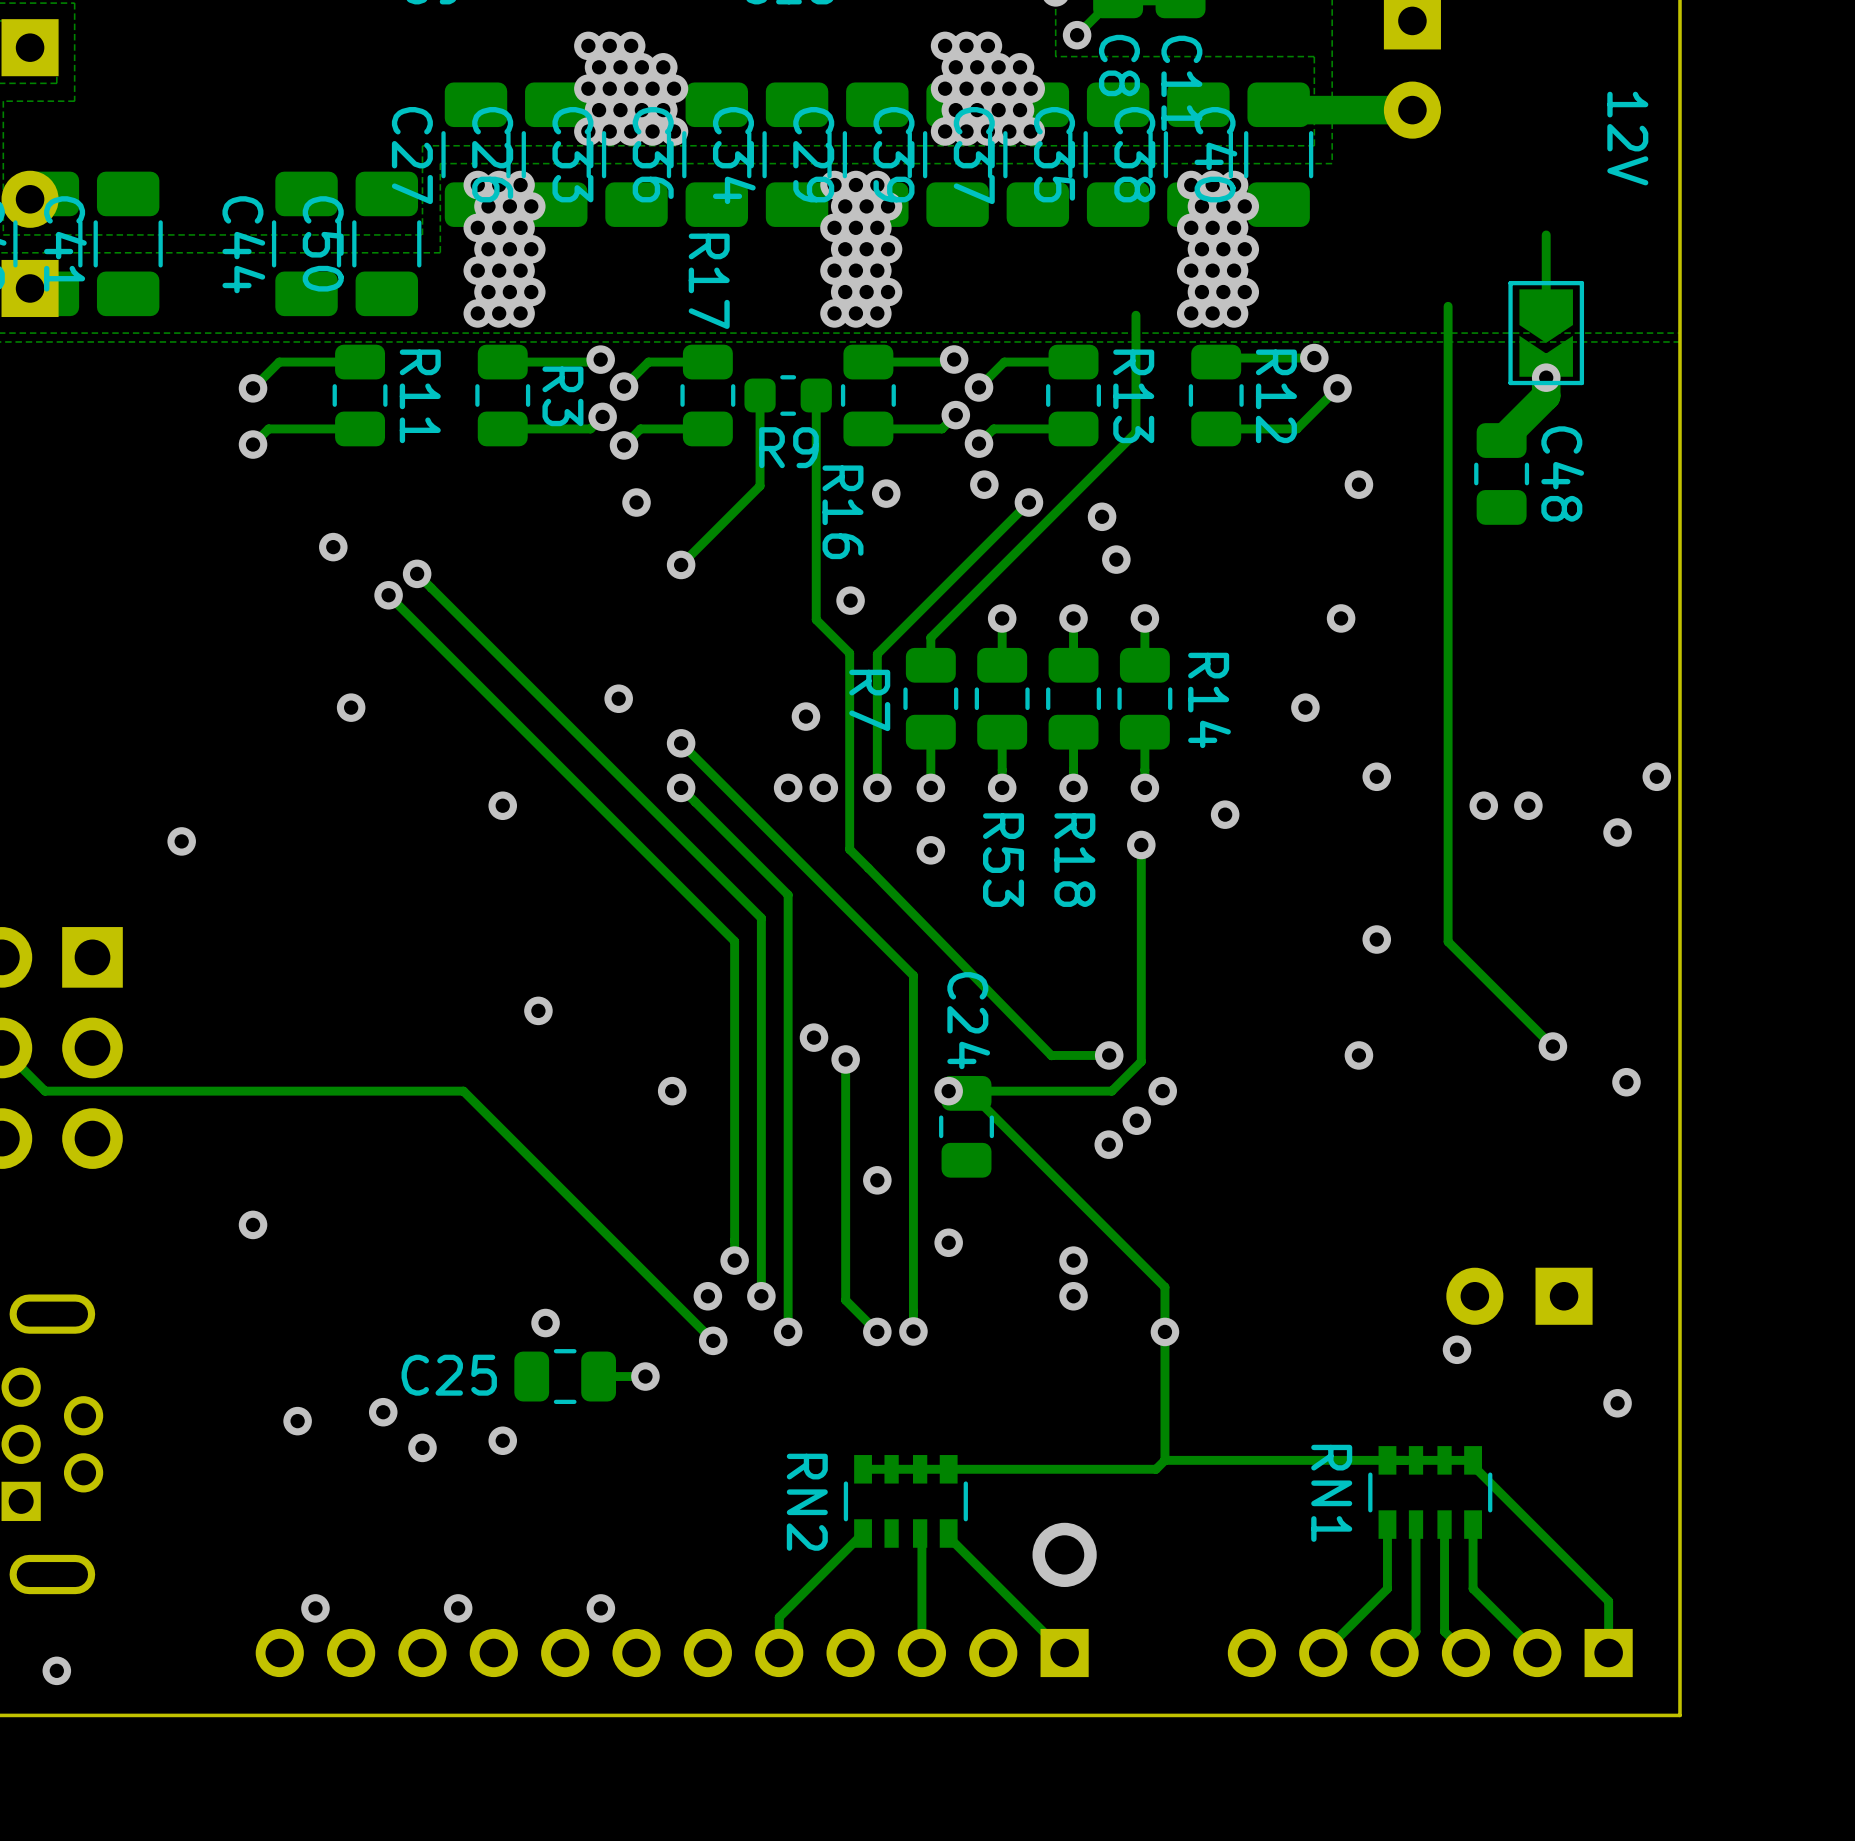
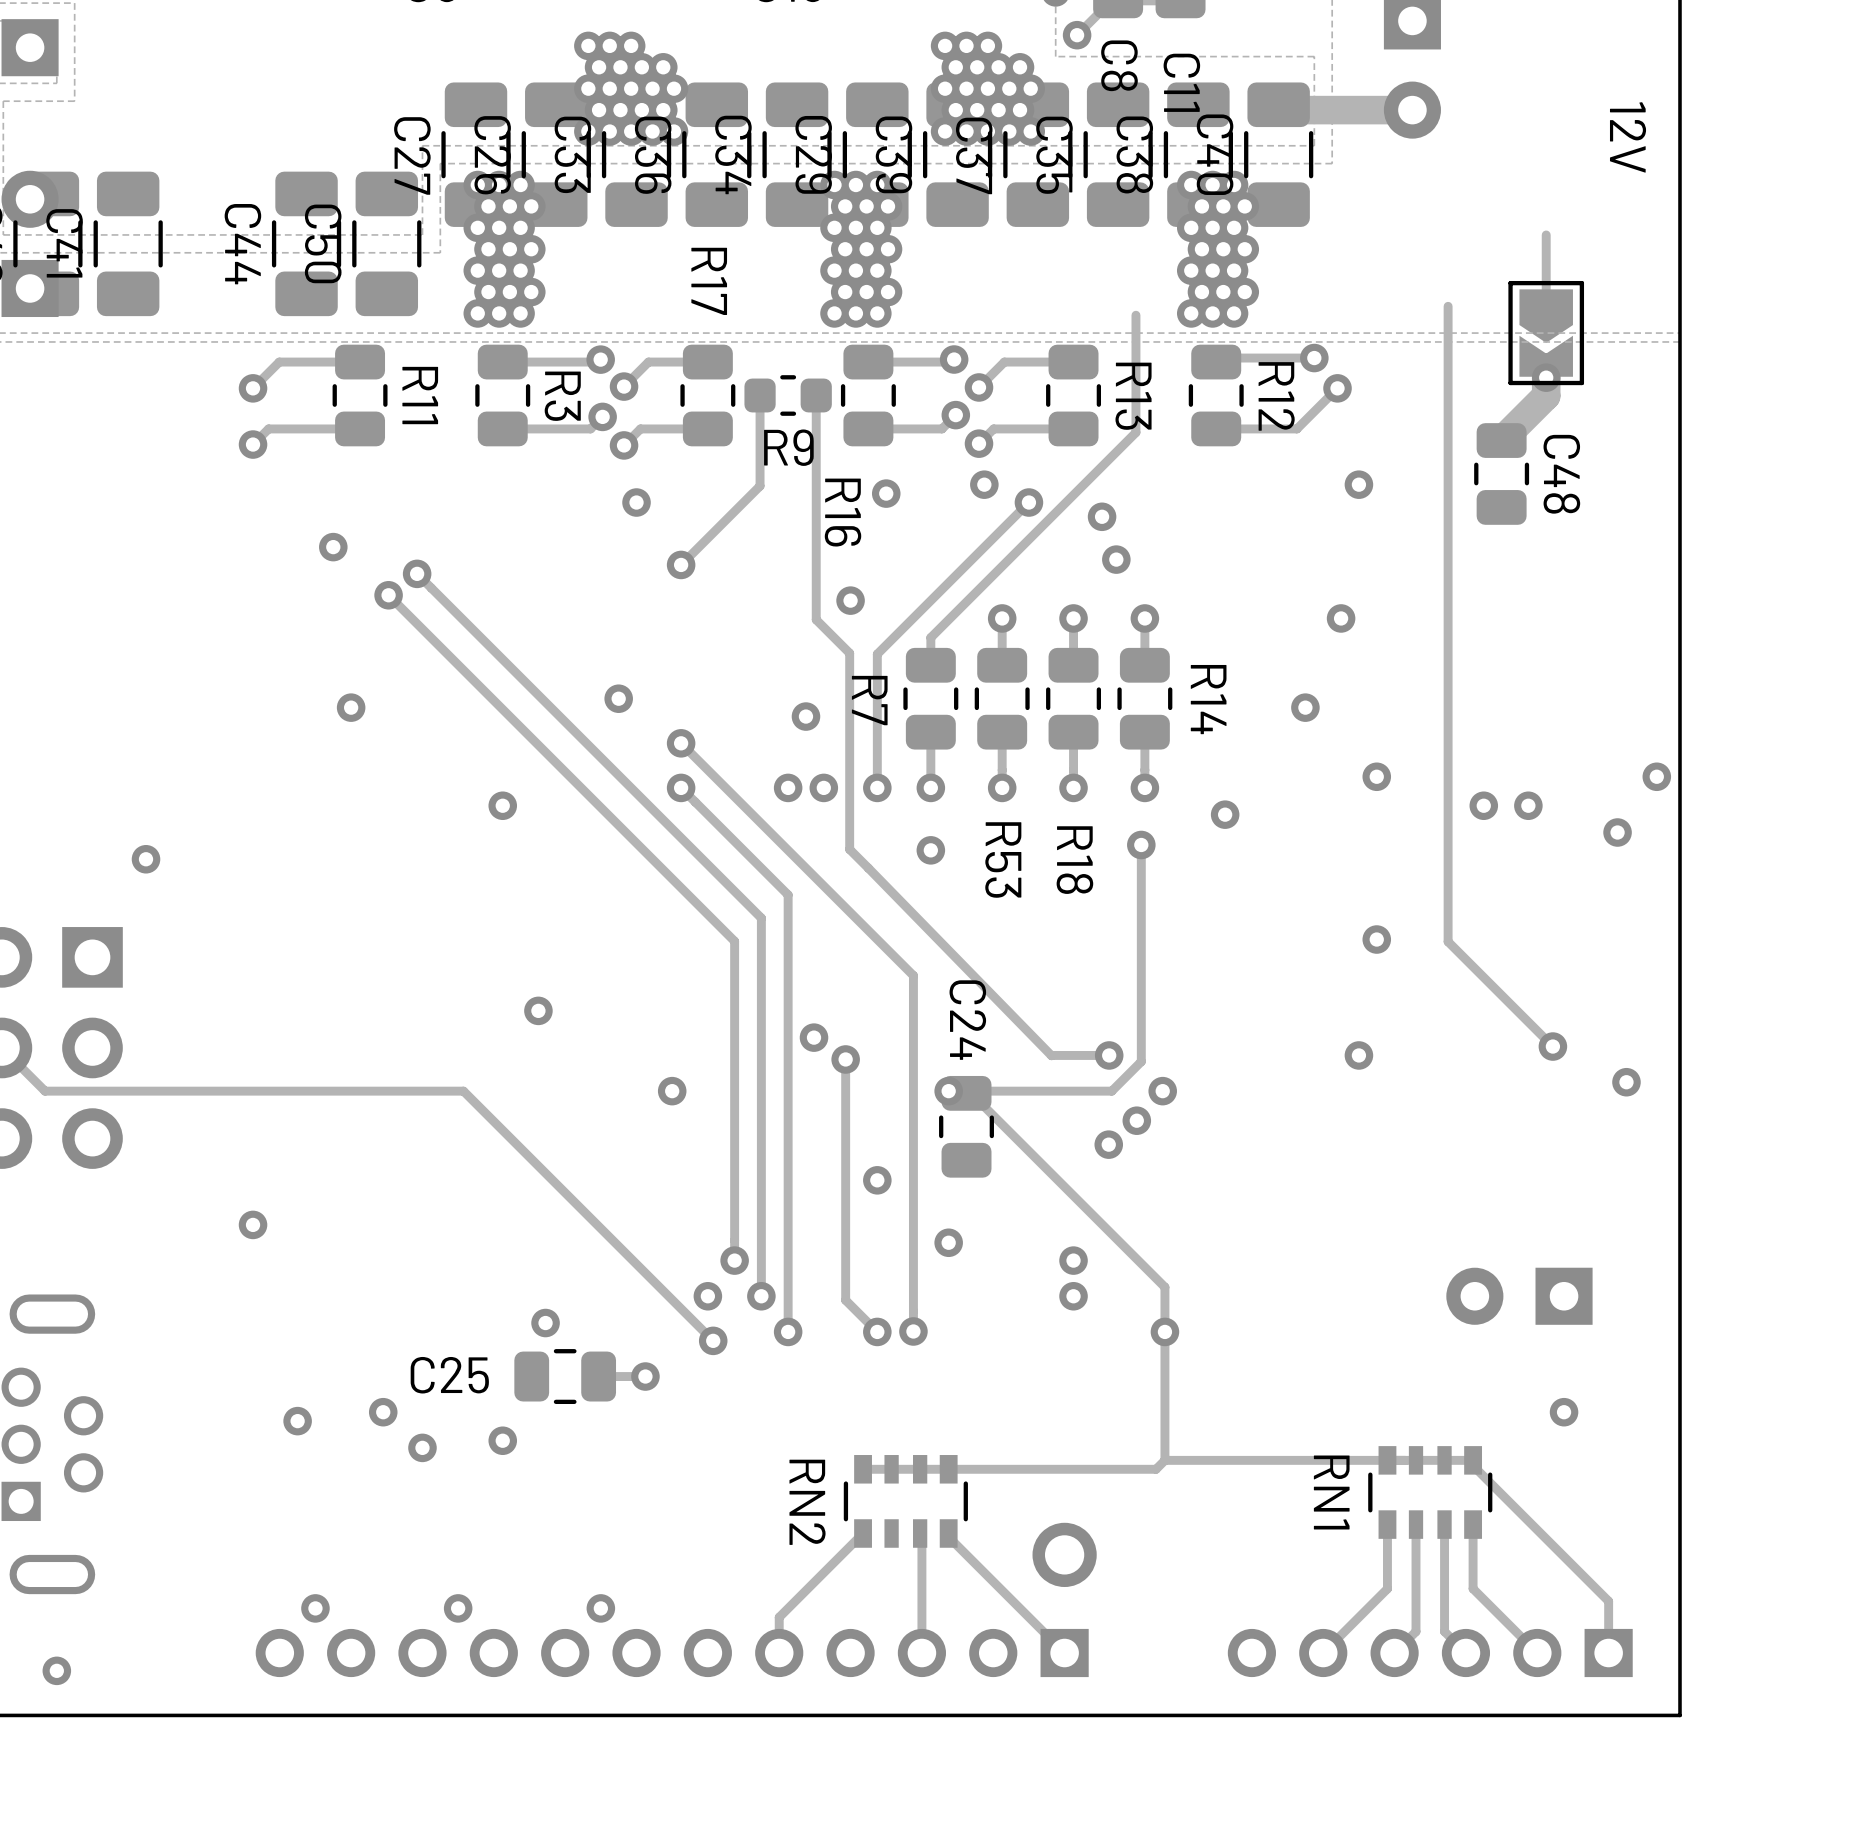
via position: (181, 841) -> (146, 859)
via: (1457, 1349) -> none
via position: (1617, 1403) -> (1564, 1412)

